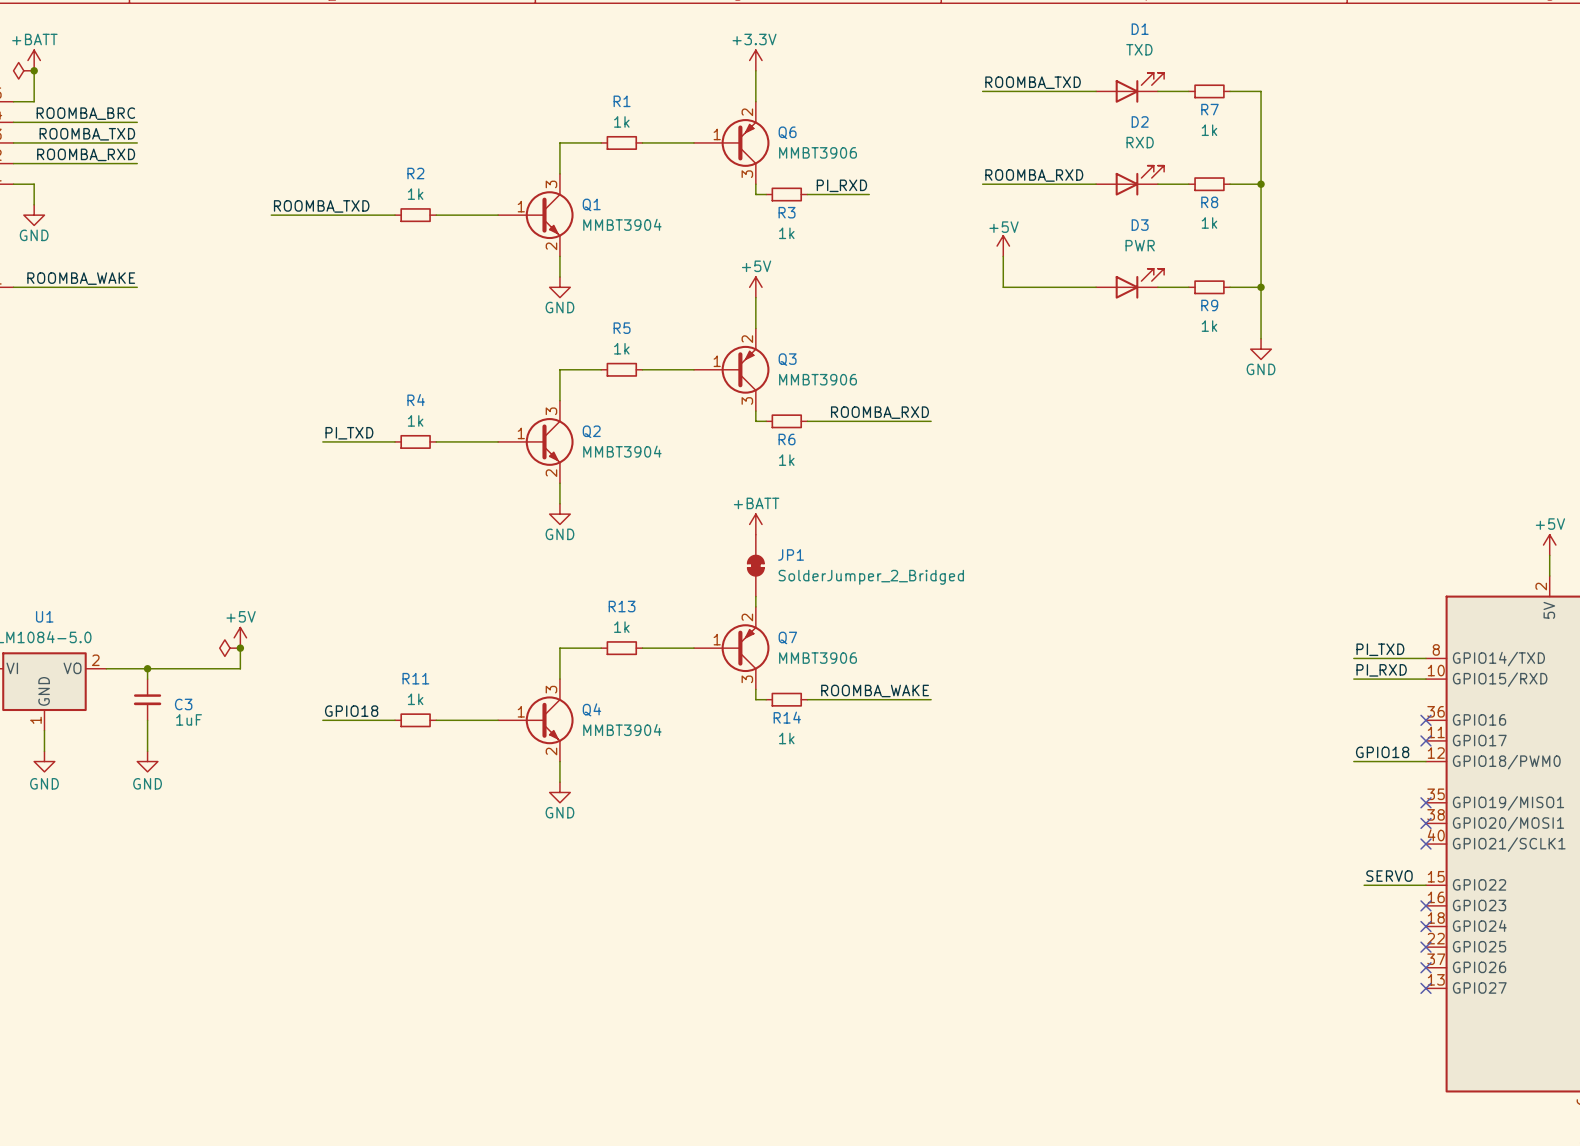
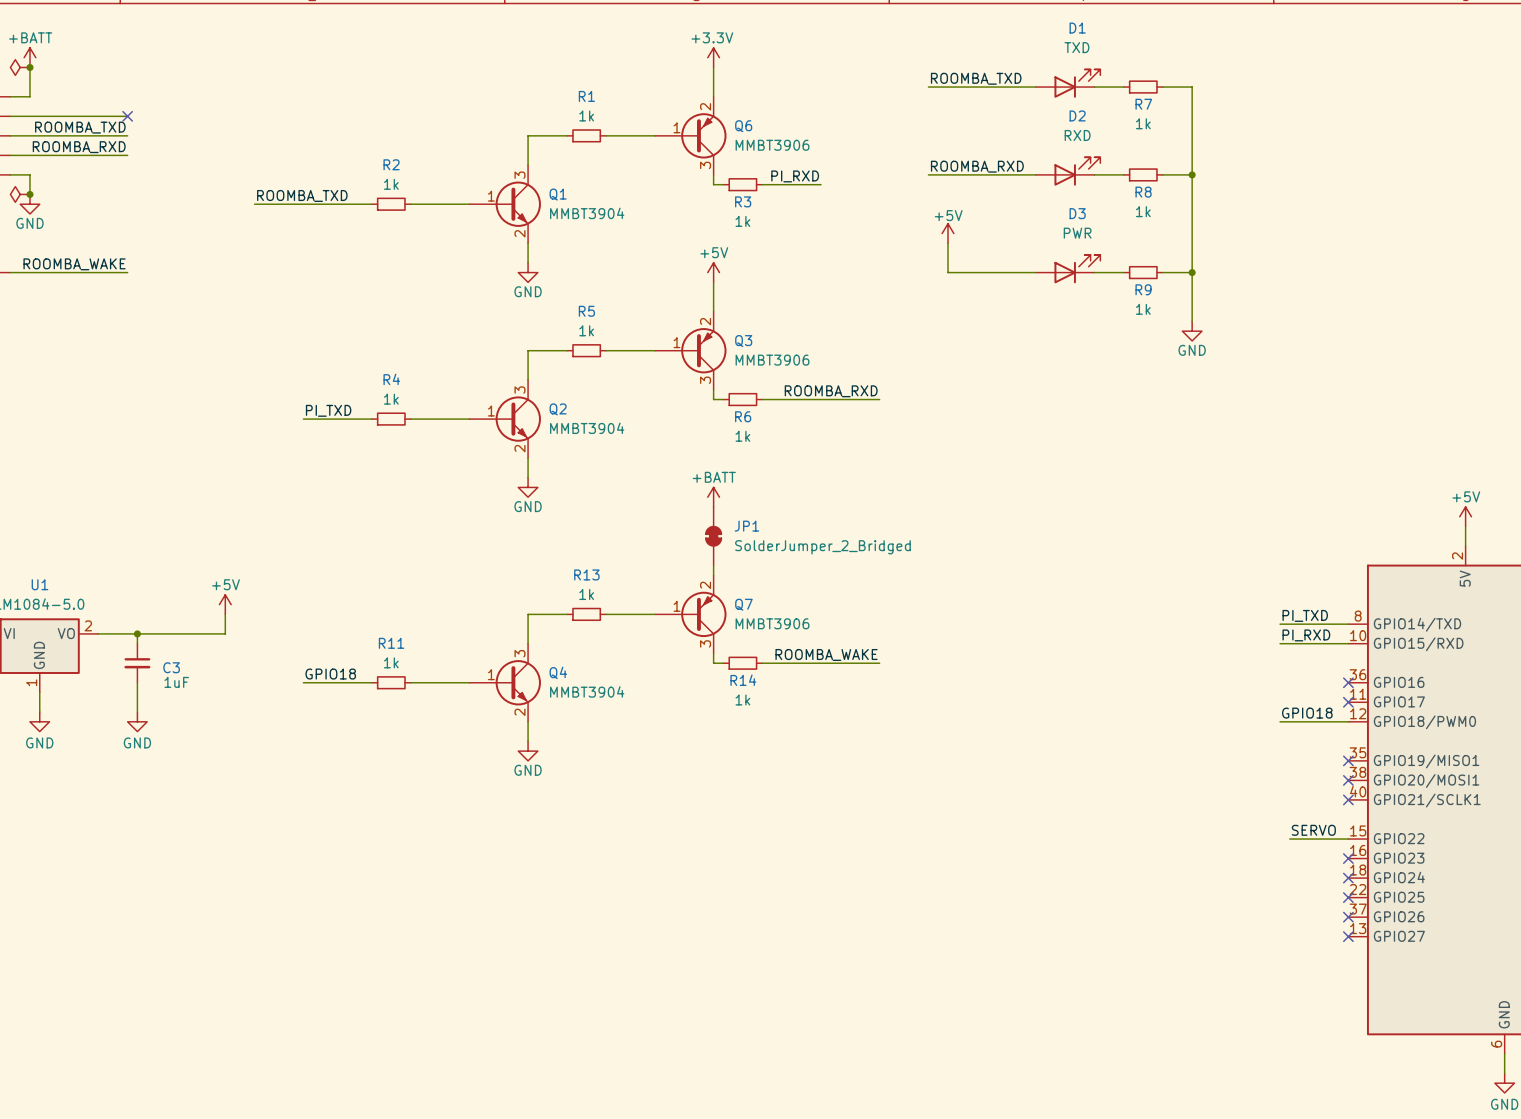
label: ROOMBA_BRC (85, 113) -> none
no-connect mark: none -> (127, 116)
power symbol: none -> (20, 194)
junction: none -> (29, 194)
power symbol: (230, 648) -> none
junction: (240, 648) -> none

